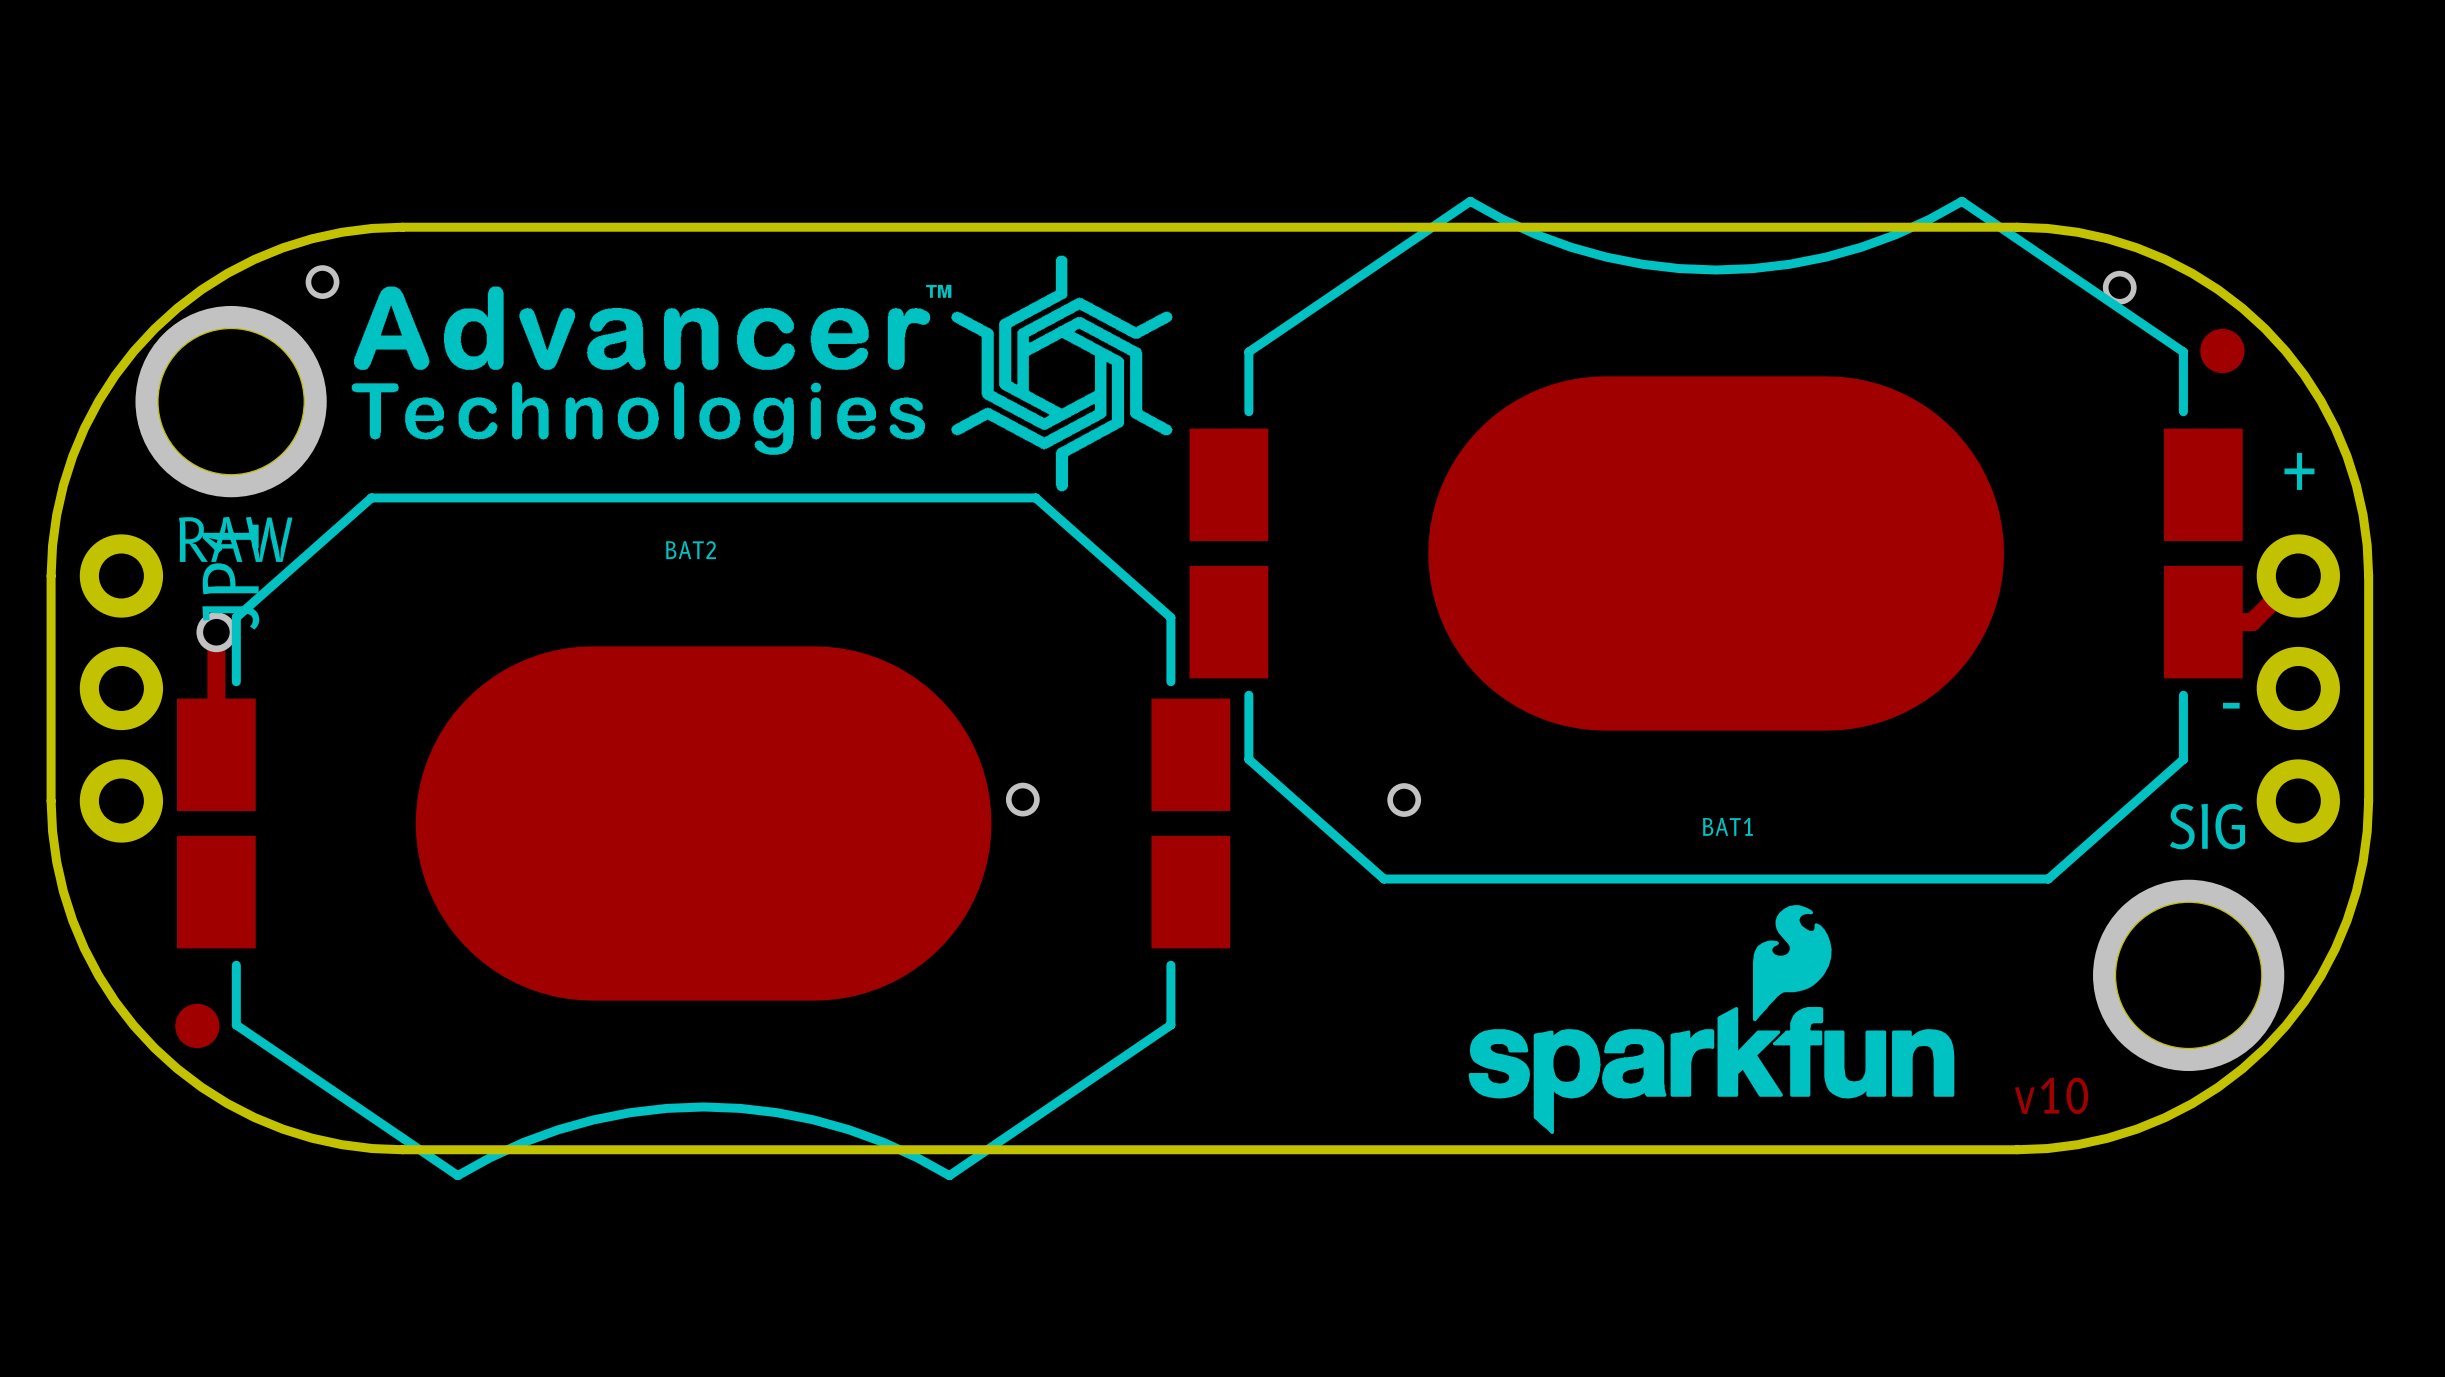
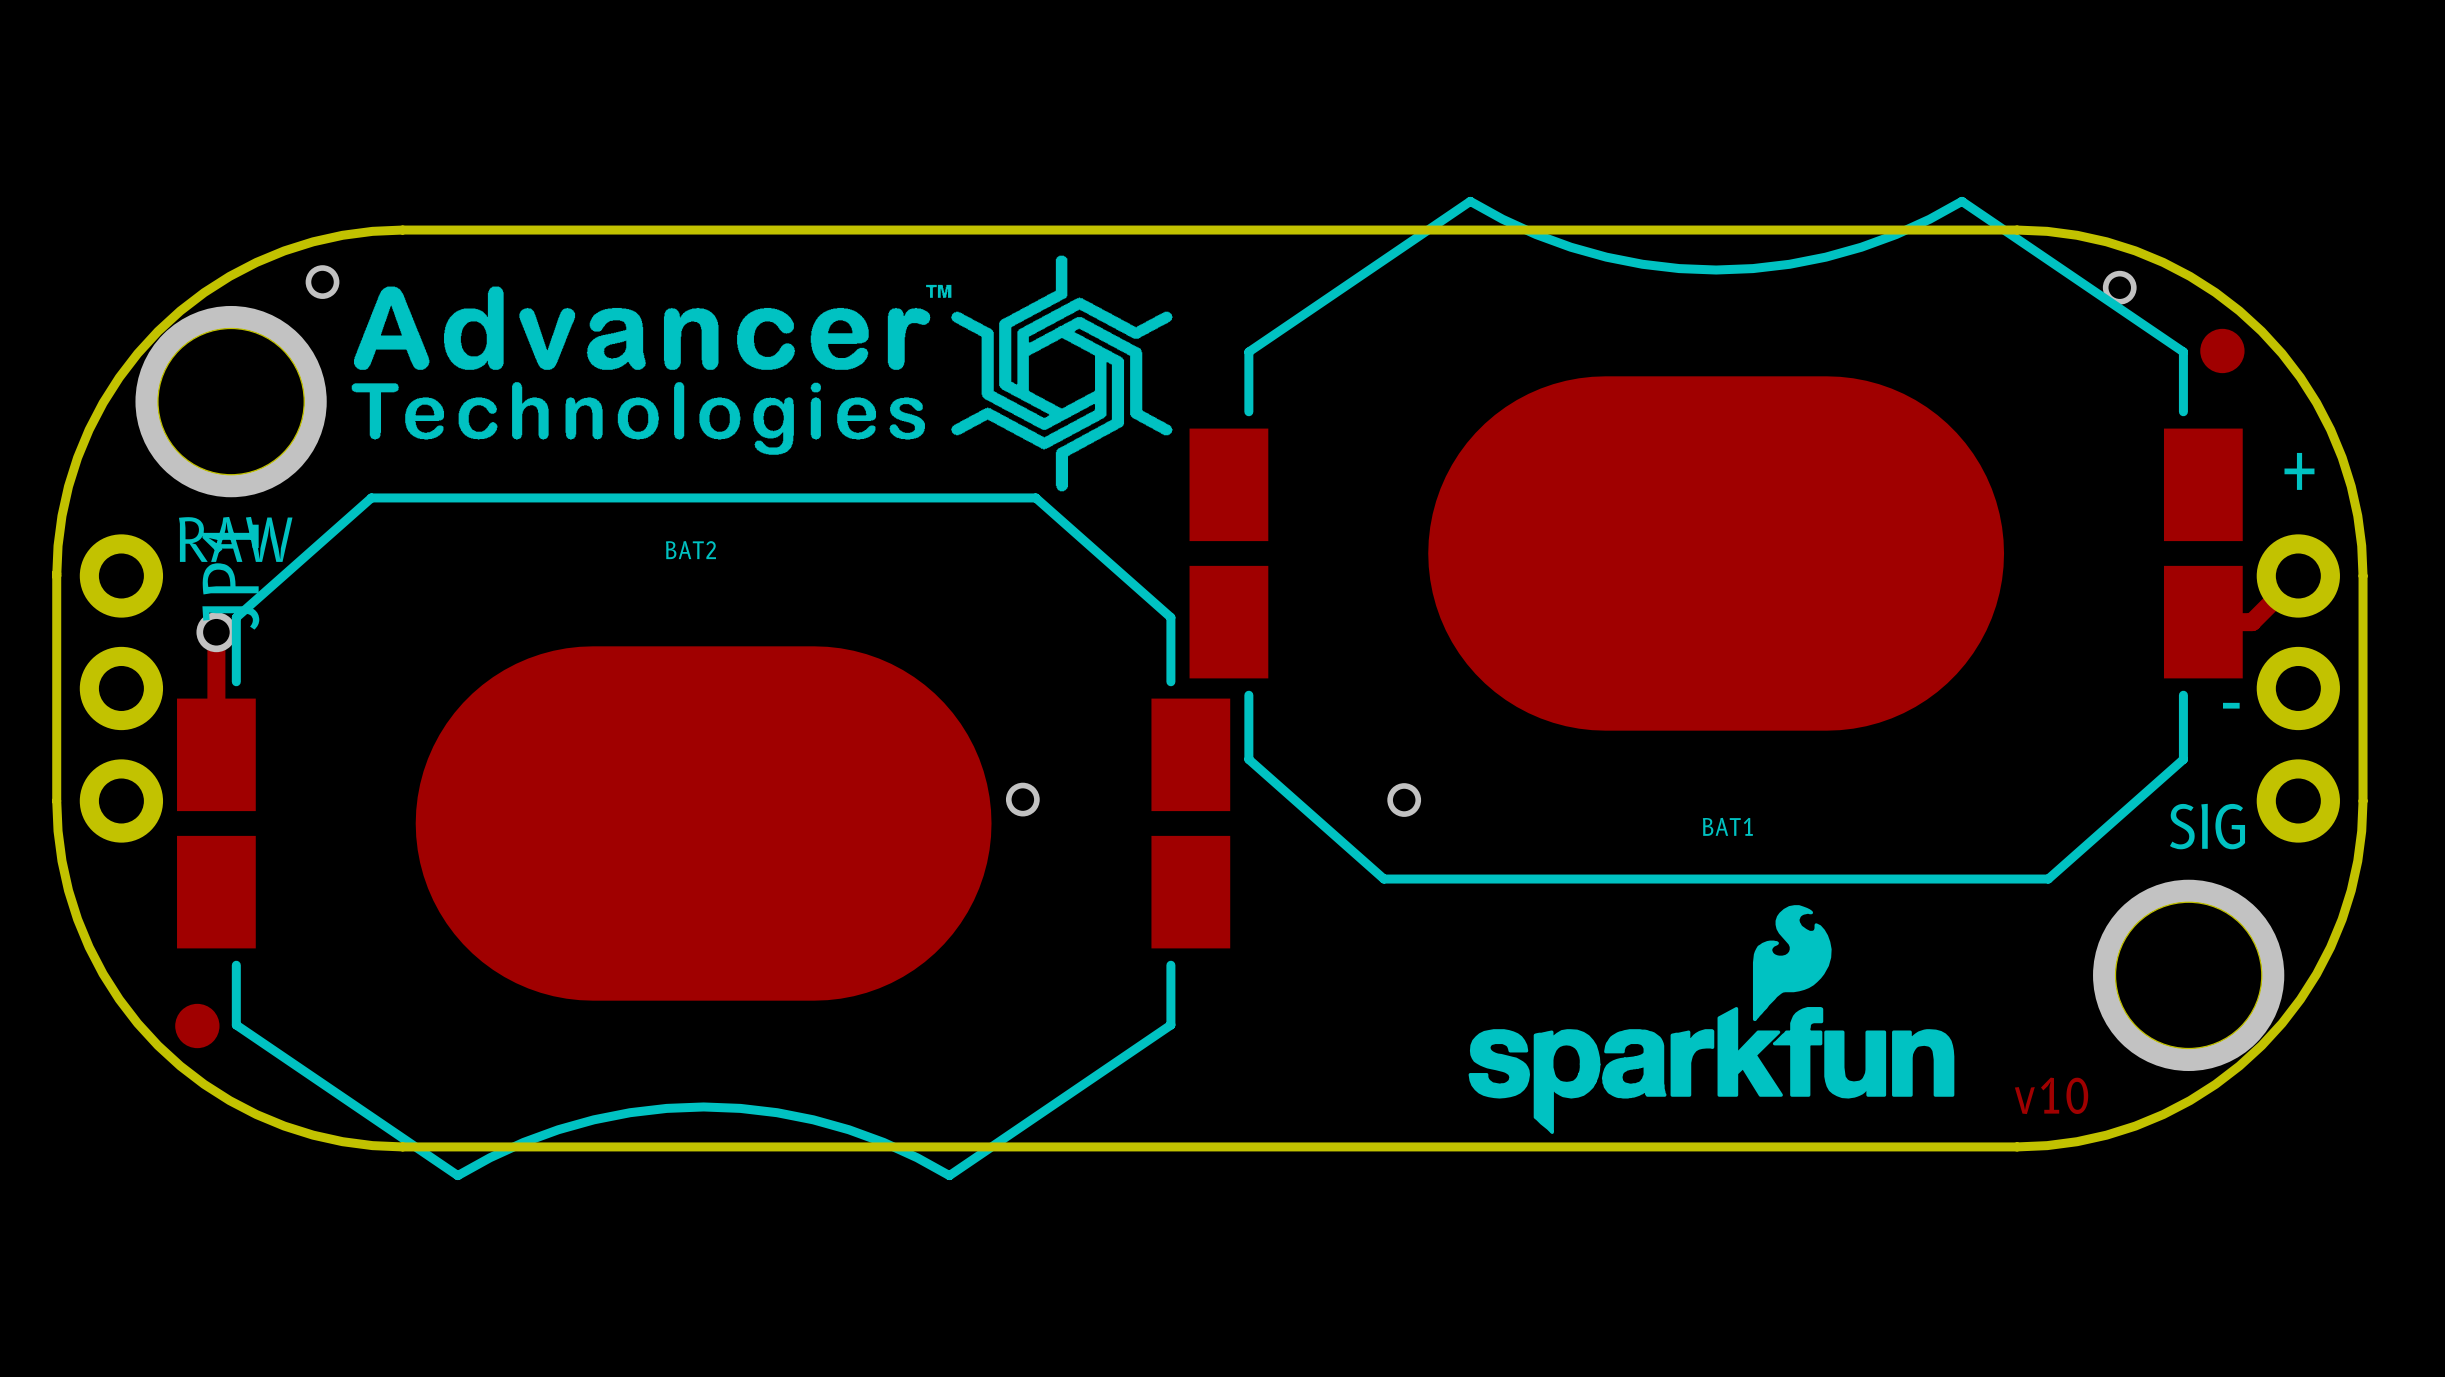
board edge: (402, 227) (2017, 227) (2077, 232) (2136, 247) (2165, 259) (2218, 289) (2265, 328) (2285, 351) (2321, 401) (2347, 456) (2356, 485) (2363, 515) (2368, 575) (2368, 800) (2363, 861) (2347, 920) (2321, 975) (2304, 1001) (2265, 1048) (2218, 1087) (2165, 1117) (2136, 1129) (2077, 1144) (2047, 1148) (402, 1149) (341, 1144) (282, 1129) (254, 1117) (201, 1087) (154, 1048) (115, 1001) (98, 975) (72, 920) (56, 861) (52, 831) (52, 545) (63, 485) (84, 428) (115, 375) (154, 328) (201, 289) (254, 259) (282, 247) (341, 232) (402, 227) -> none
board edge: none -> (56, 573) (56, 800) (58, 831) (68, 890) (89, 947) (103, 973) (119, 999) (158, 1045) (204, 1084) (256, 1114) (284, 1126) (313, 1135) (372, 1145) (2017, 1146) (2077, 1141) (2135, 1126) (2190, 1100) (2239, 1066) (2261, 1045) (2300, 999) (2330, 947) (2351, 890) (2361, 831) (2361, 545) (2351, 486) (2330, 429) (2316, 403) (2300, 377) (2261, 331) (2215, 292) (2163, 262) (2135, 250) (2106, 241) (2047, 231) (402, 230) (342, 235) (284, 250) (229, 276) (180, 310) (137, 353) (103, 403) (77, 457) (61, 515) (58, 545) (56, 575)

